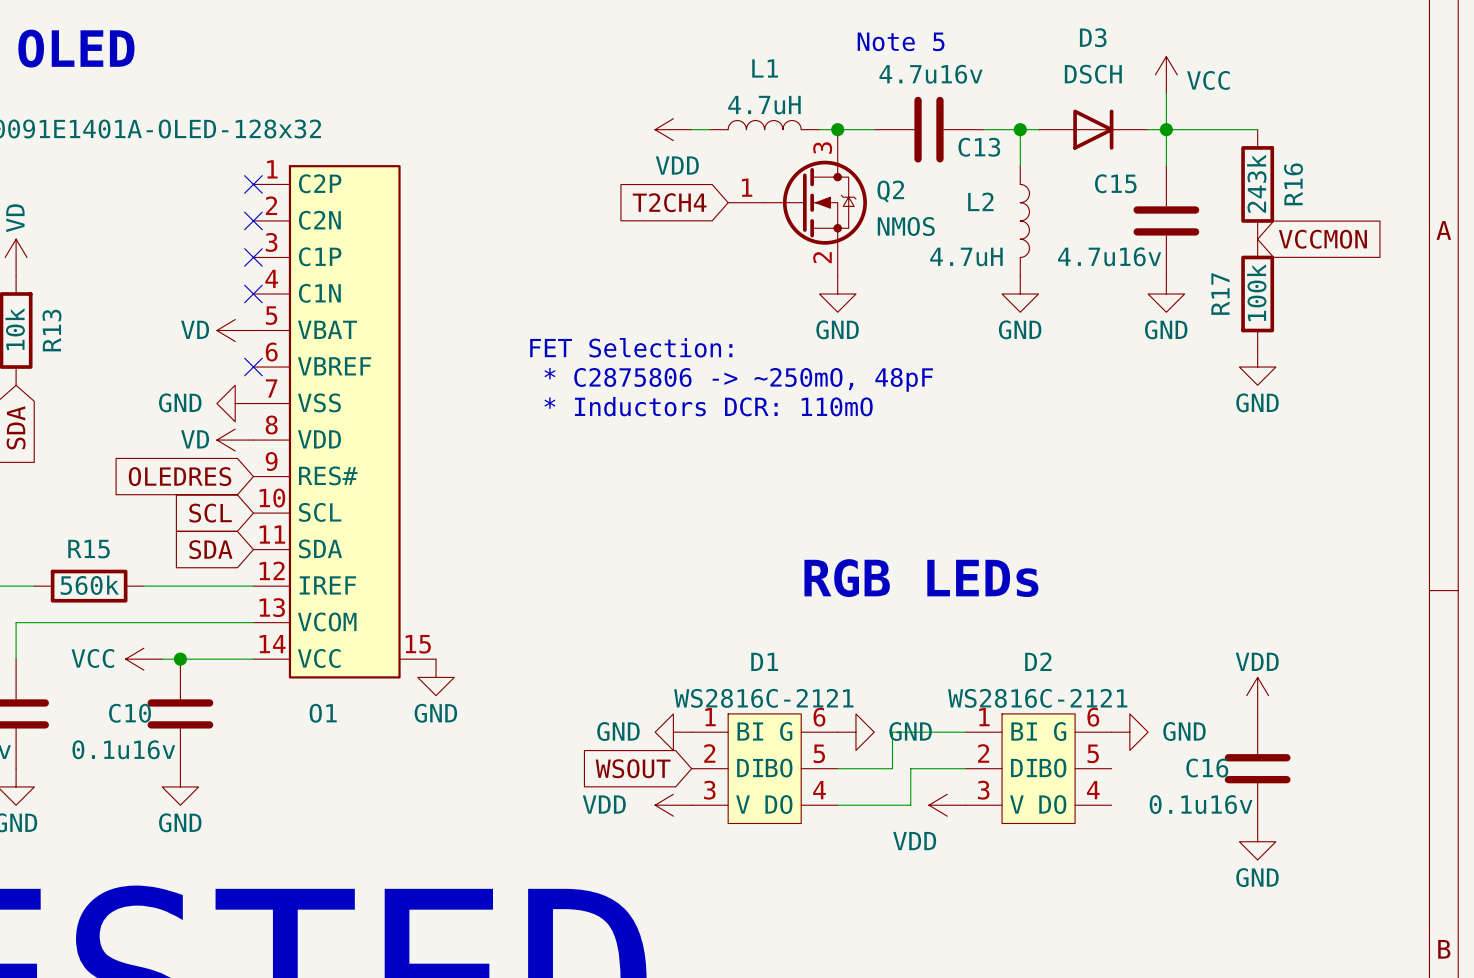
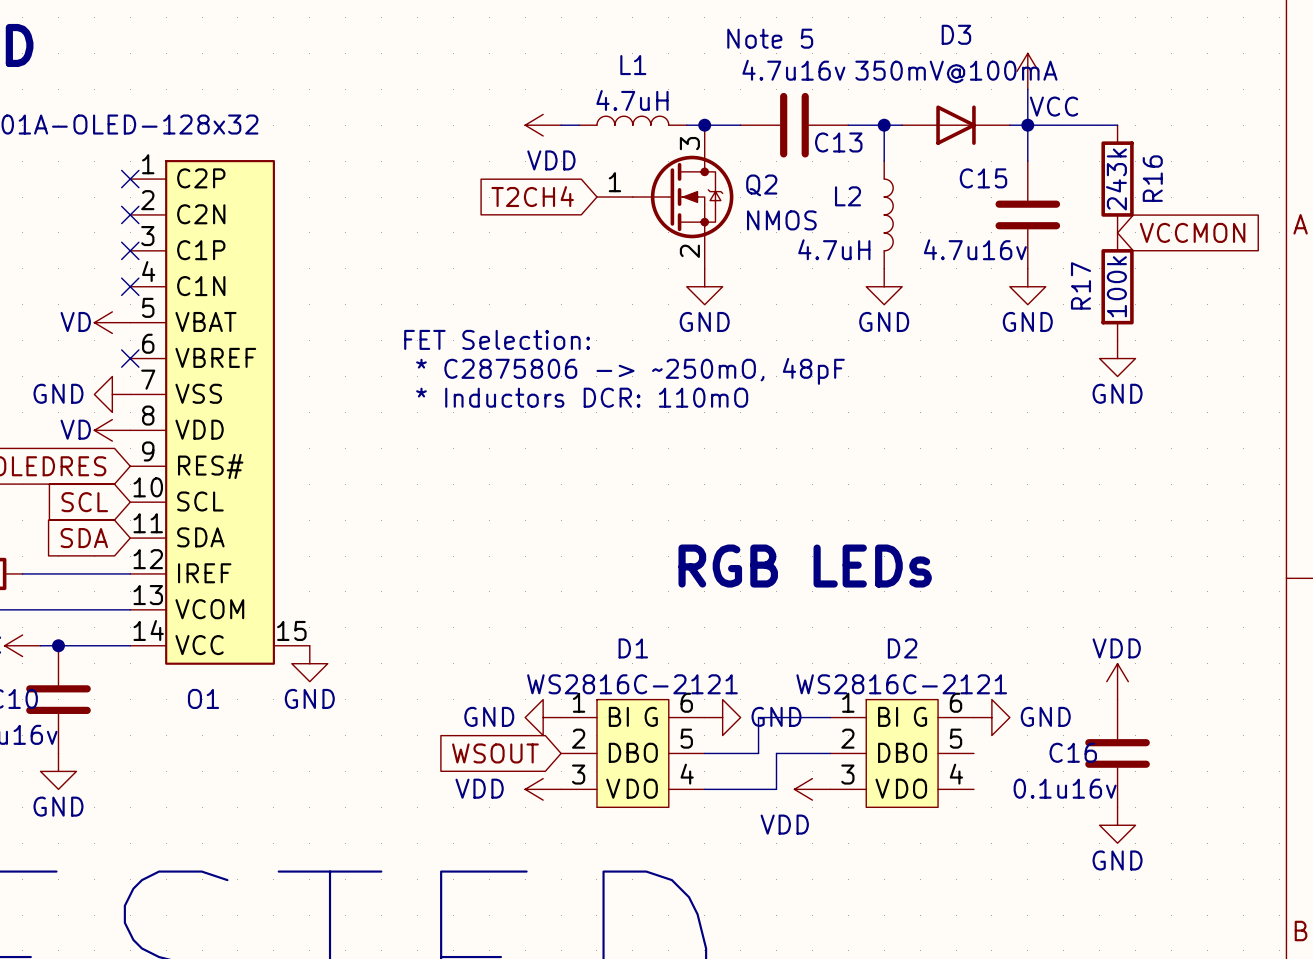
D3 value: DSCH (1093, 74) -> 350mV@100mA (956, 71)
power symbol text position: VCC (1208, 80) -> VCC (1054, 106)

